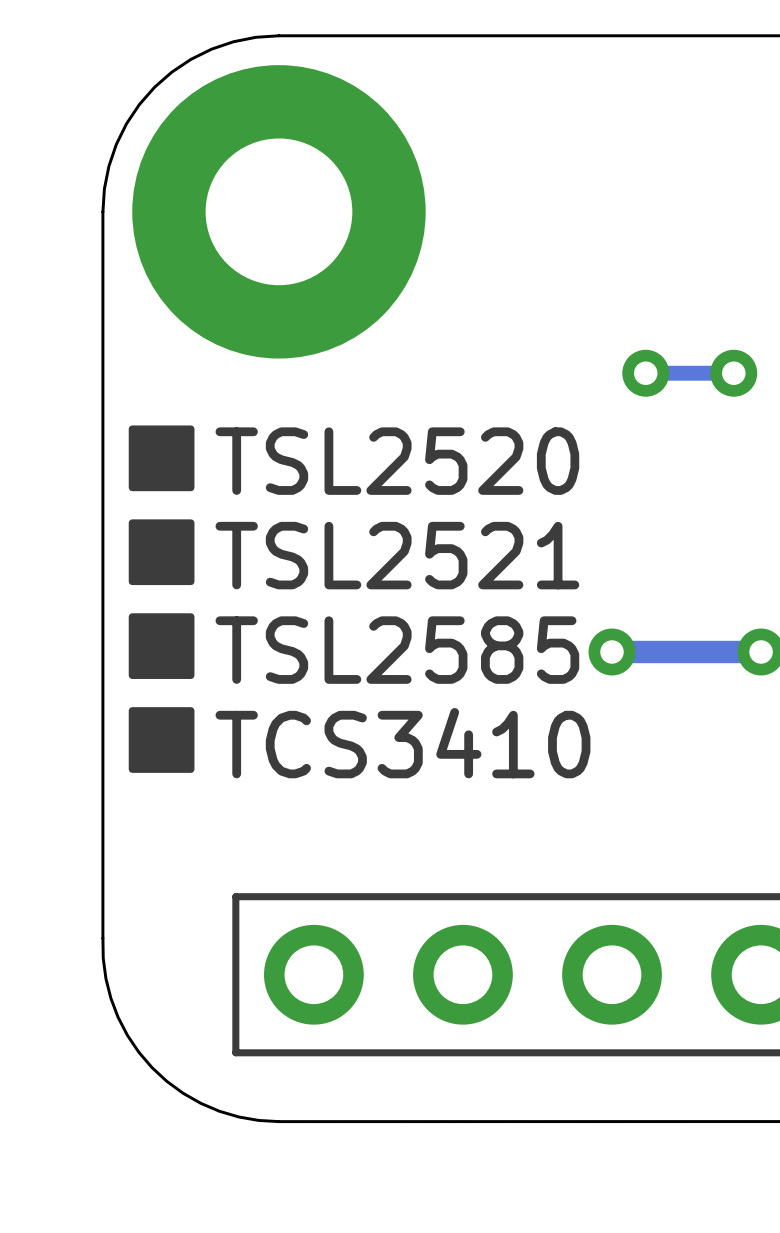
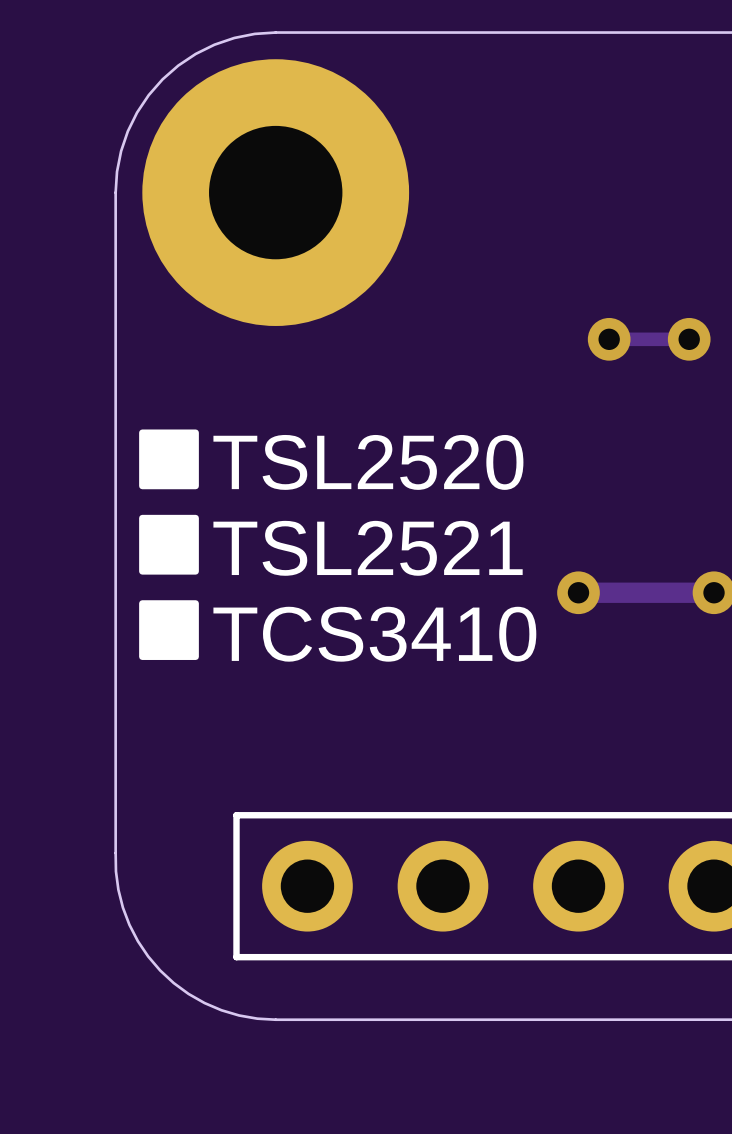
drawing: [128, 425, 195, 773] -> none
text position: TSL2520 (397, 461) -> TSL2520 (368, 462)
drawing: none -> [139, 429, 199, 660]
text position: TSL2521 (397, 555) -> TSL2521 (368, 548)
text: TSL2585 (397, 650) -> none
text position: TCS3410 (402, 743) -> TCS3410 (374, 634)

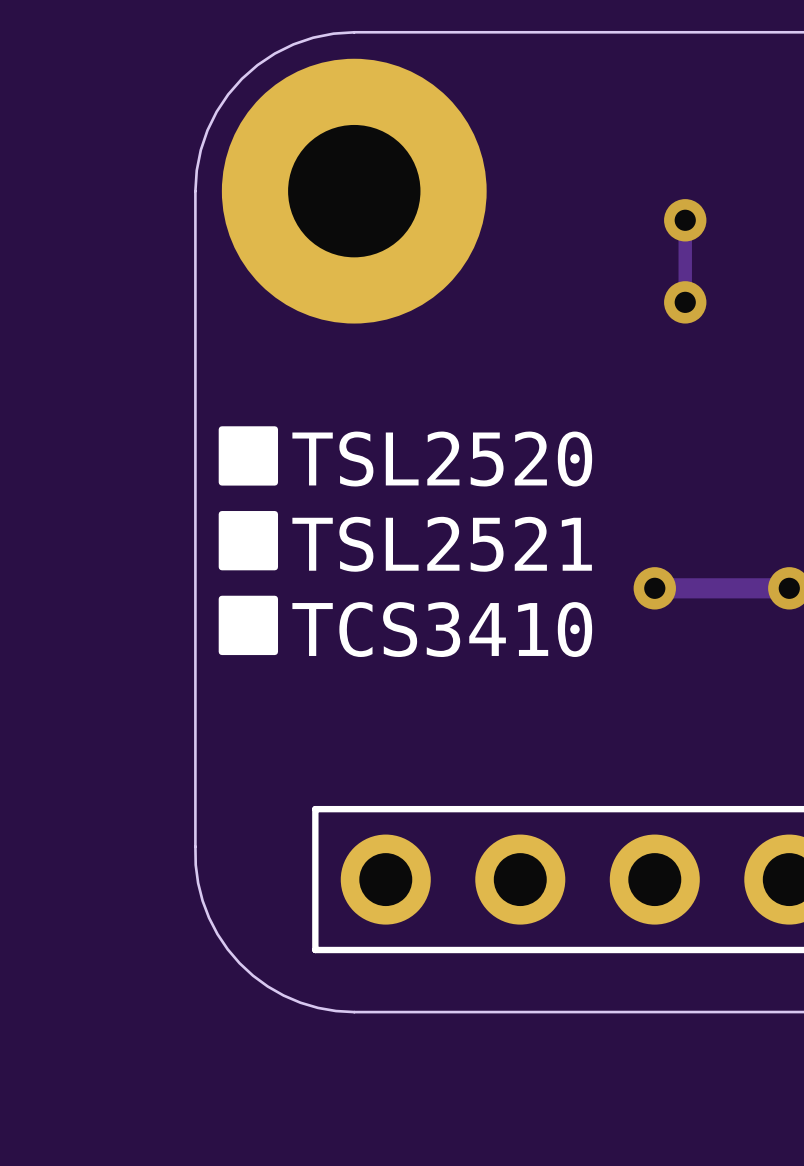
track: none -> (685, 220) (685, 302)
via: none -> (685, 220)
via position: (609, 339) -> (685, 302)
track: (689, 339) (609, 339) -> none
via: (689, 339) -> none

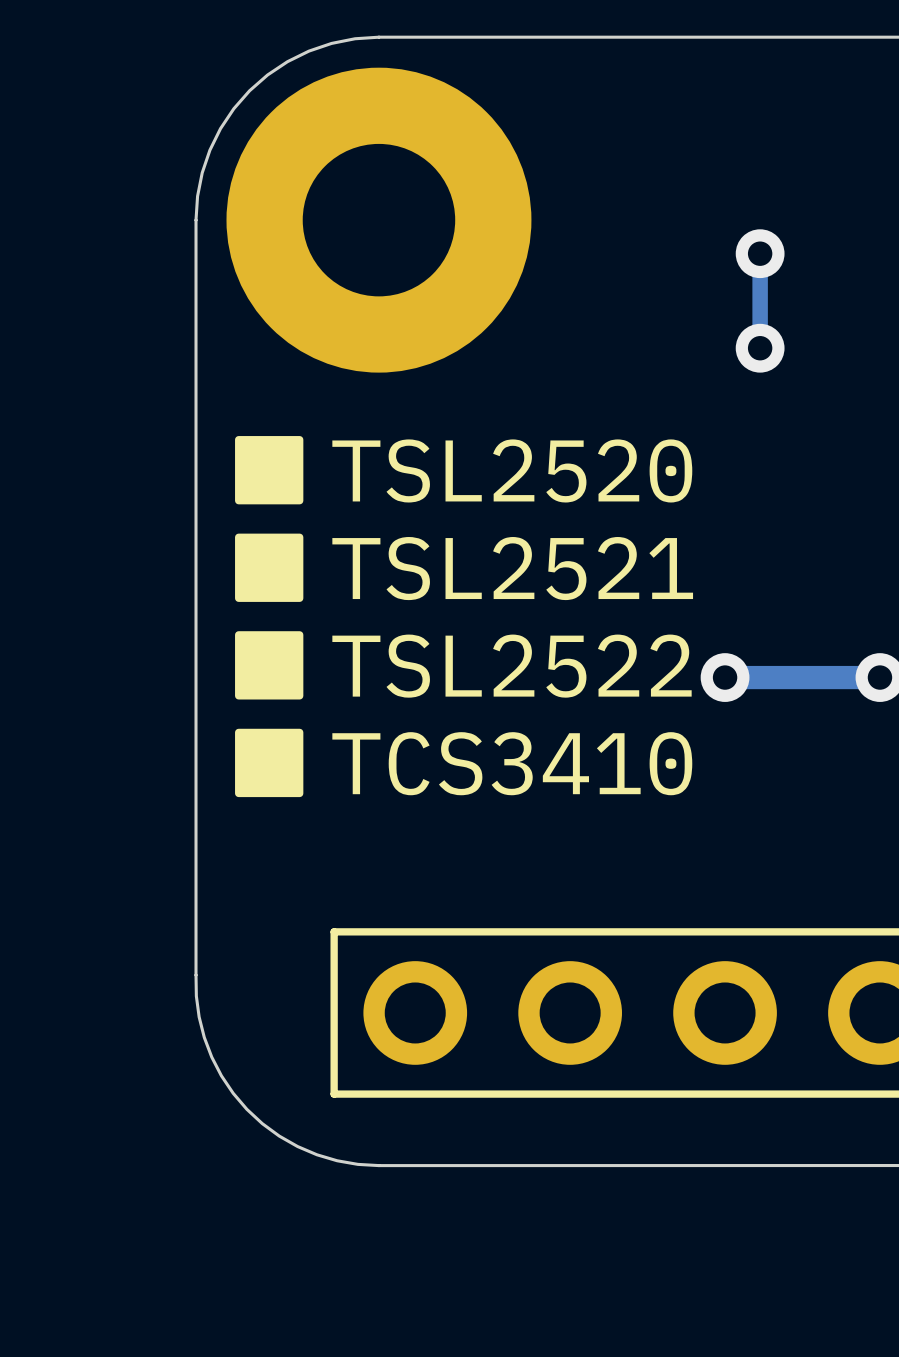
drawing: none -> [235, 436, 304, 798]
drawing: [218, 426, 279, 656] -> none
text position: TSL2520 (442, 459) -> TSL2520 (512, 470)
text position: TSL2521 (442, 544) -> TSL2521 (512, 568)
text: none -> TSL2522 (512, 666)
text position: TCS3410 (442, 629) -> TCS3410 (512, 763)

